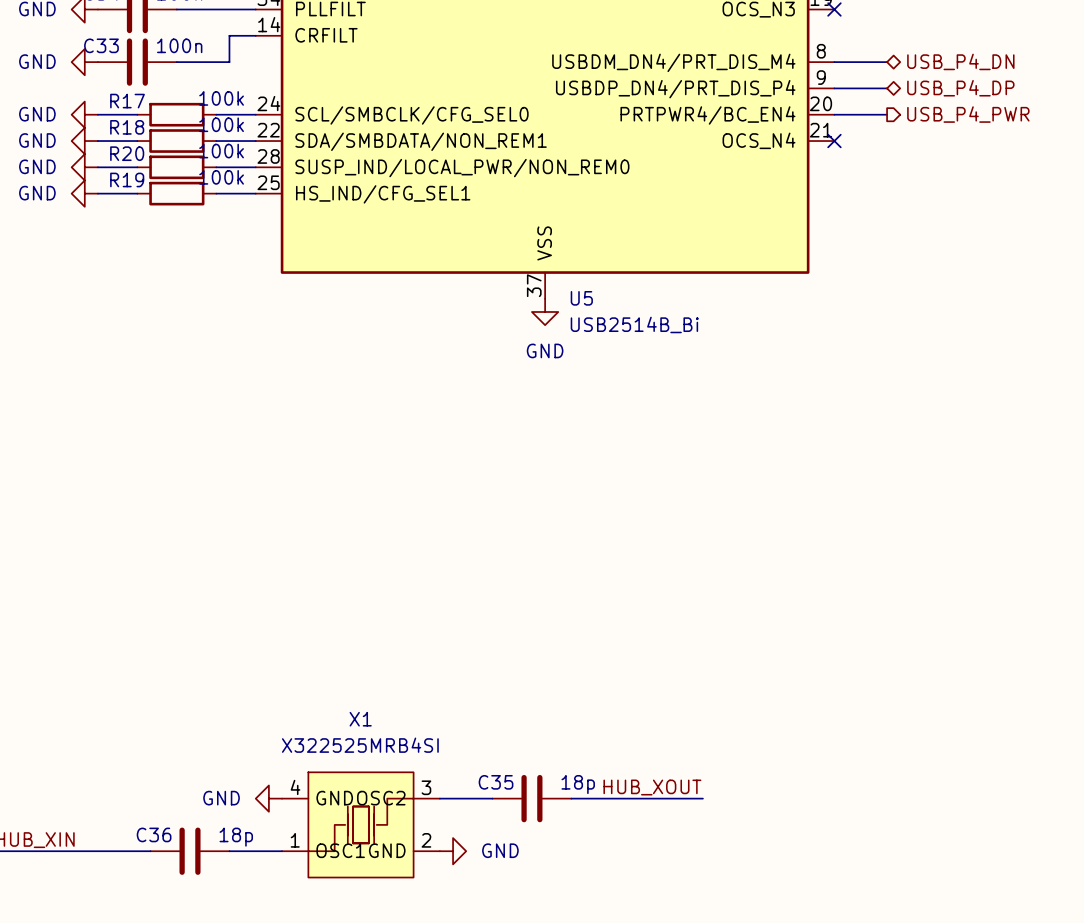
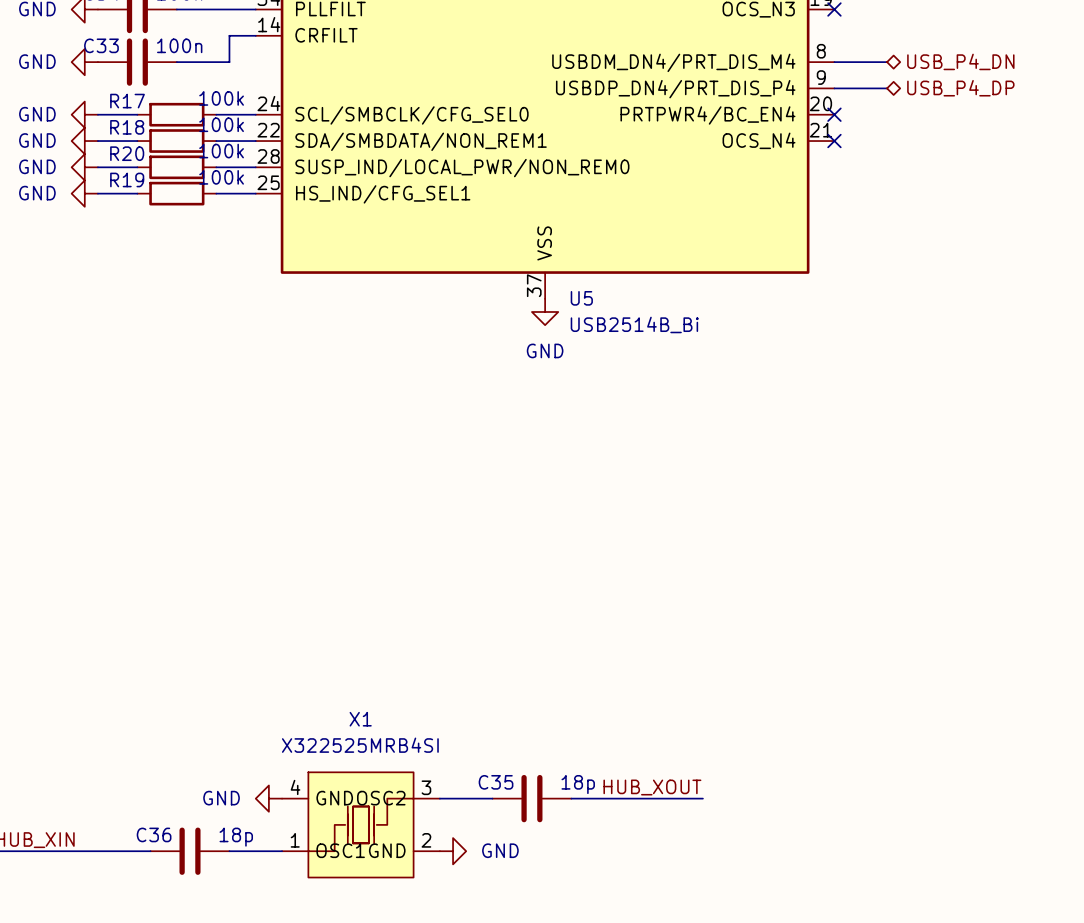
wire: (834, 114) (887, 114) -> none
no-connect mark: none -> (834, 114)
hierarchical label: USB_P4_PWR (968, 114) -> none

